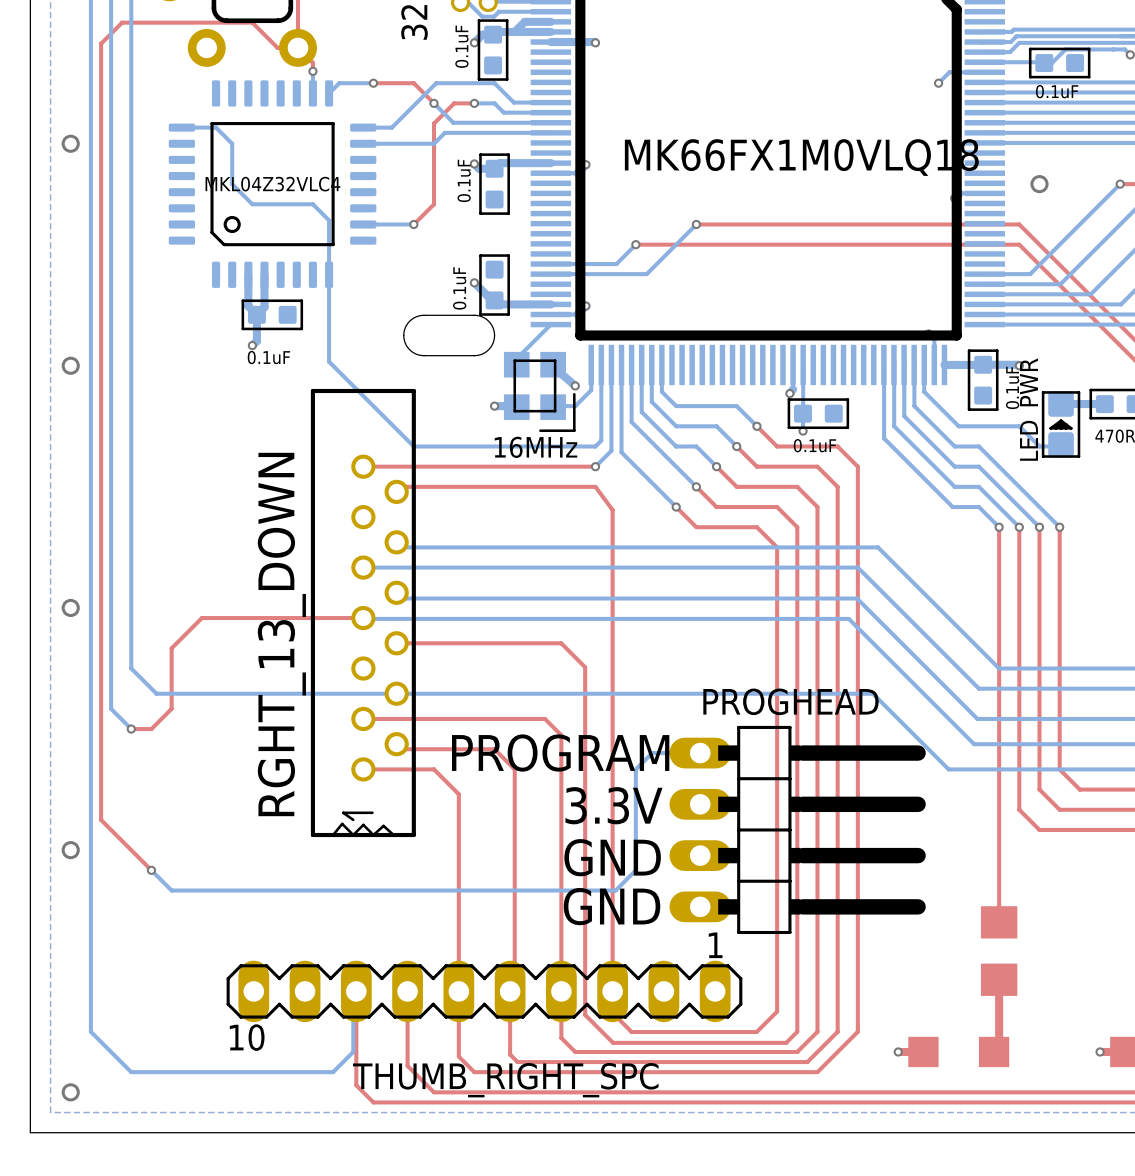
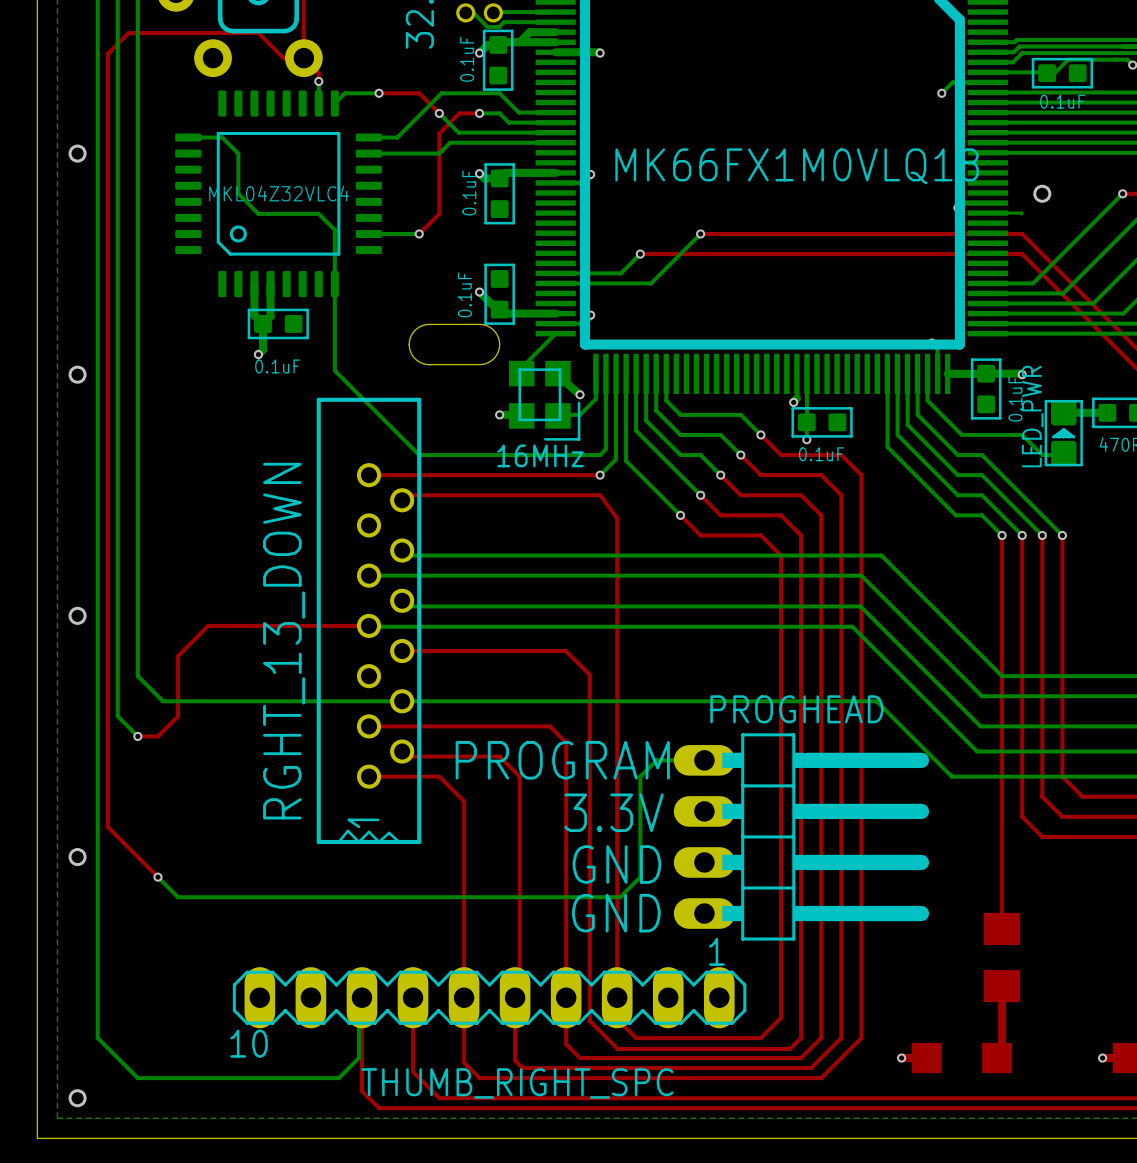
bottom track: none -> (987, 213) (1022, 213)

